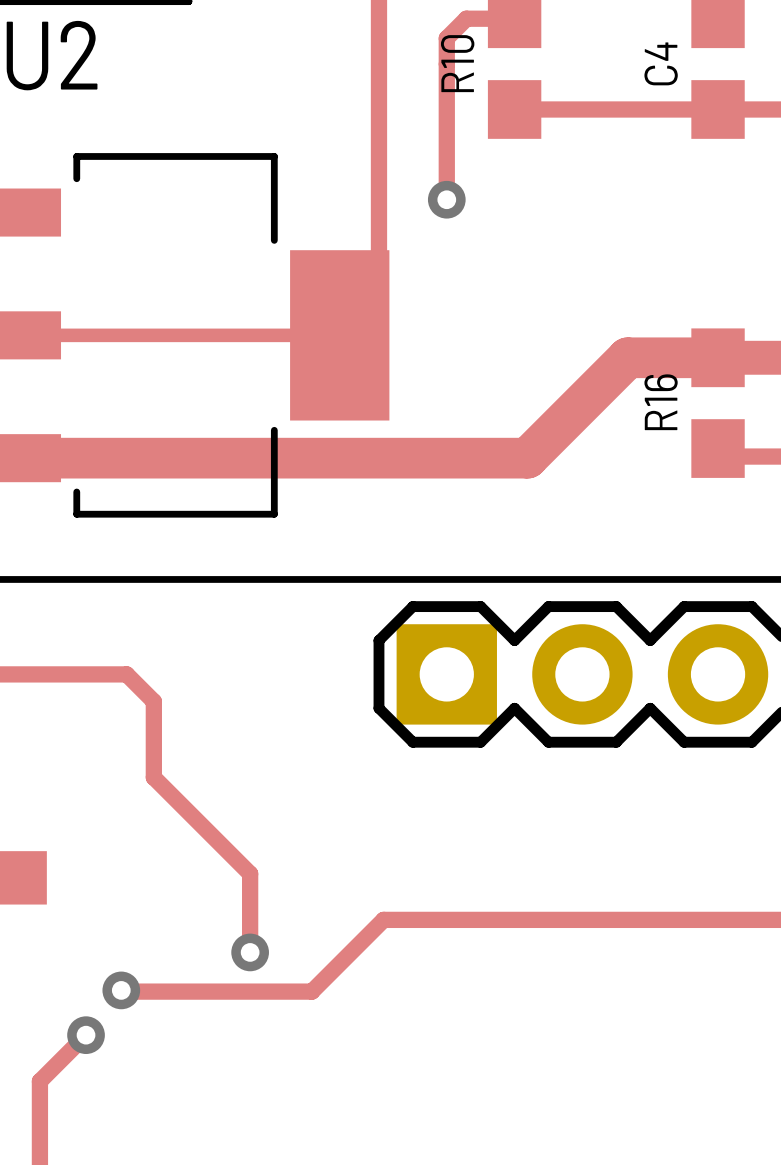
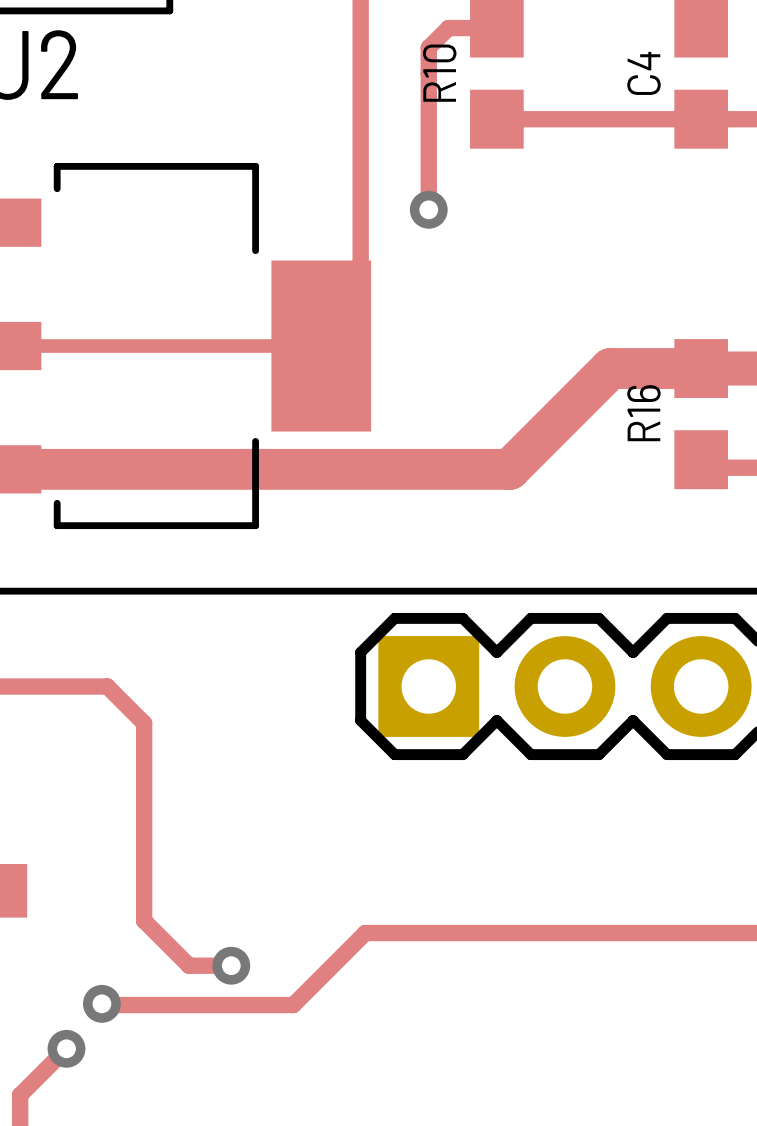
track: (153, 701) (153, 777) (250, 873) (250, 952) -> (134, 713) (144, 723) (144, 920) (189, 965) (231, 965)

